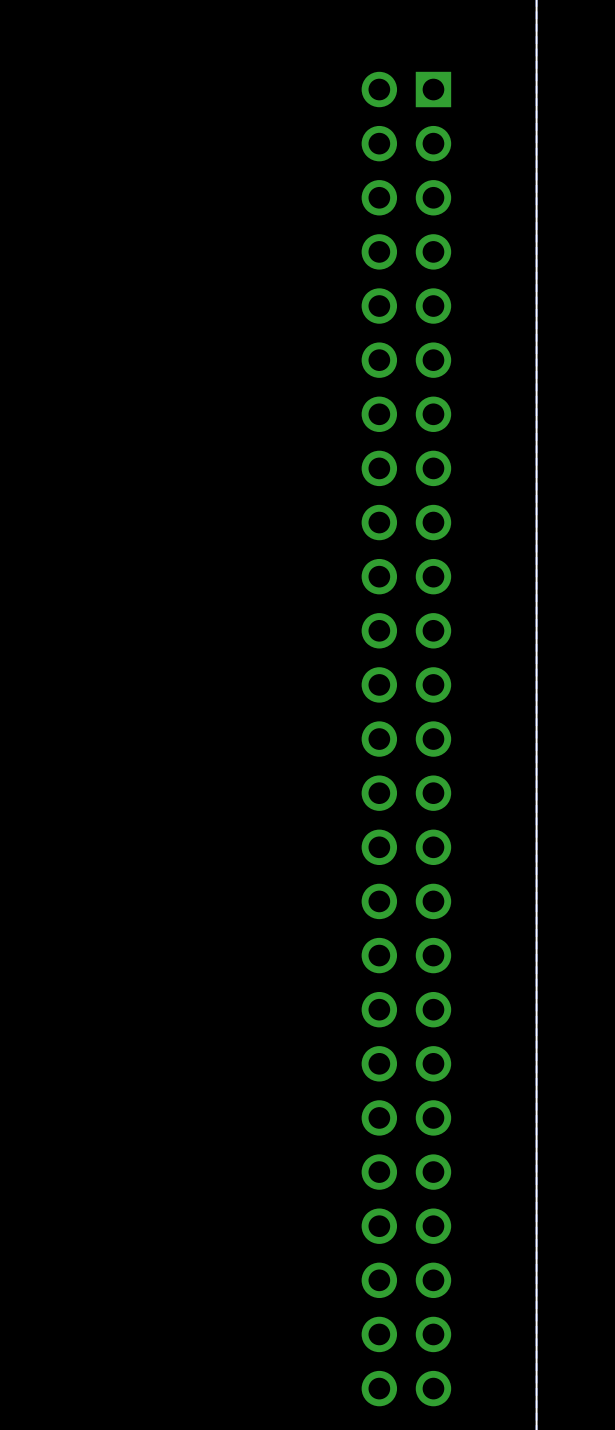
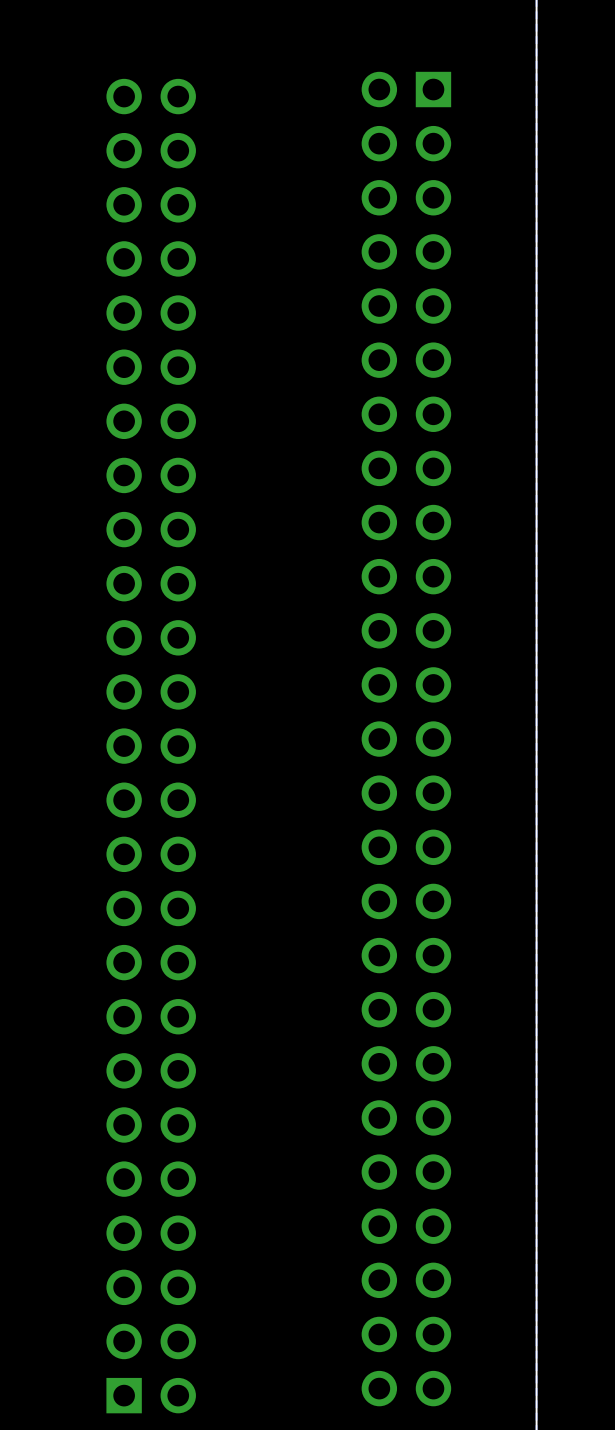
part: none -> (151, 746)

